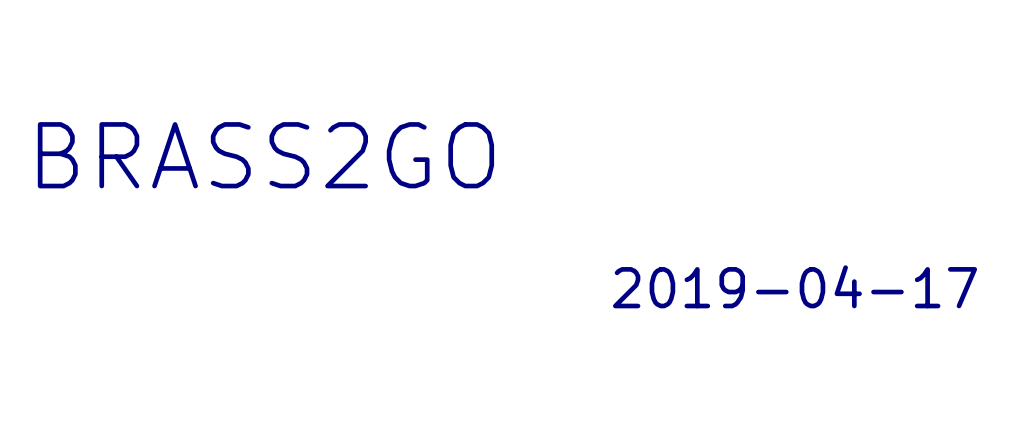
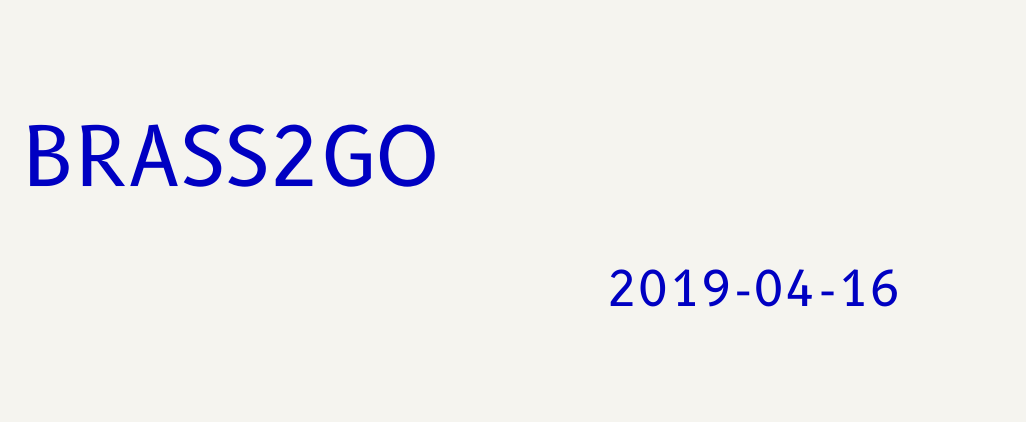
text: 2019-04-17 (795, 286) -> 2019-04-16 (753, 287)

